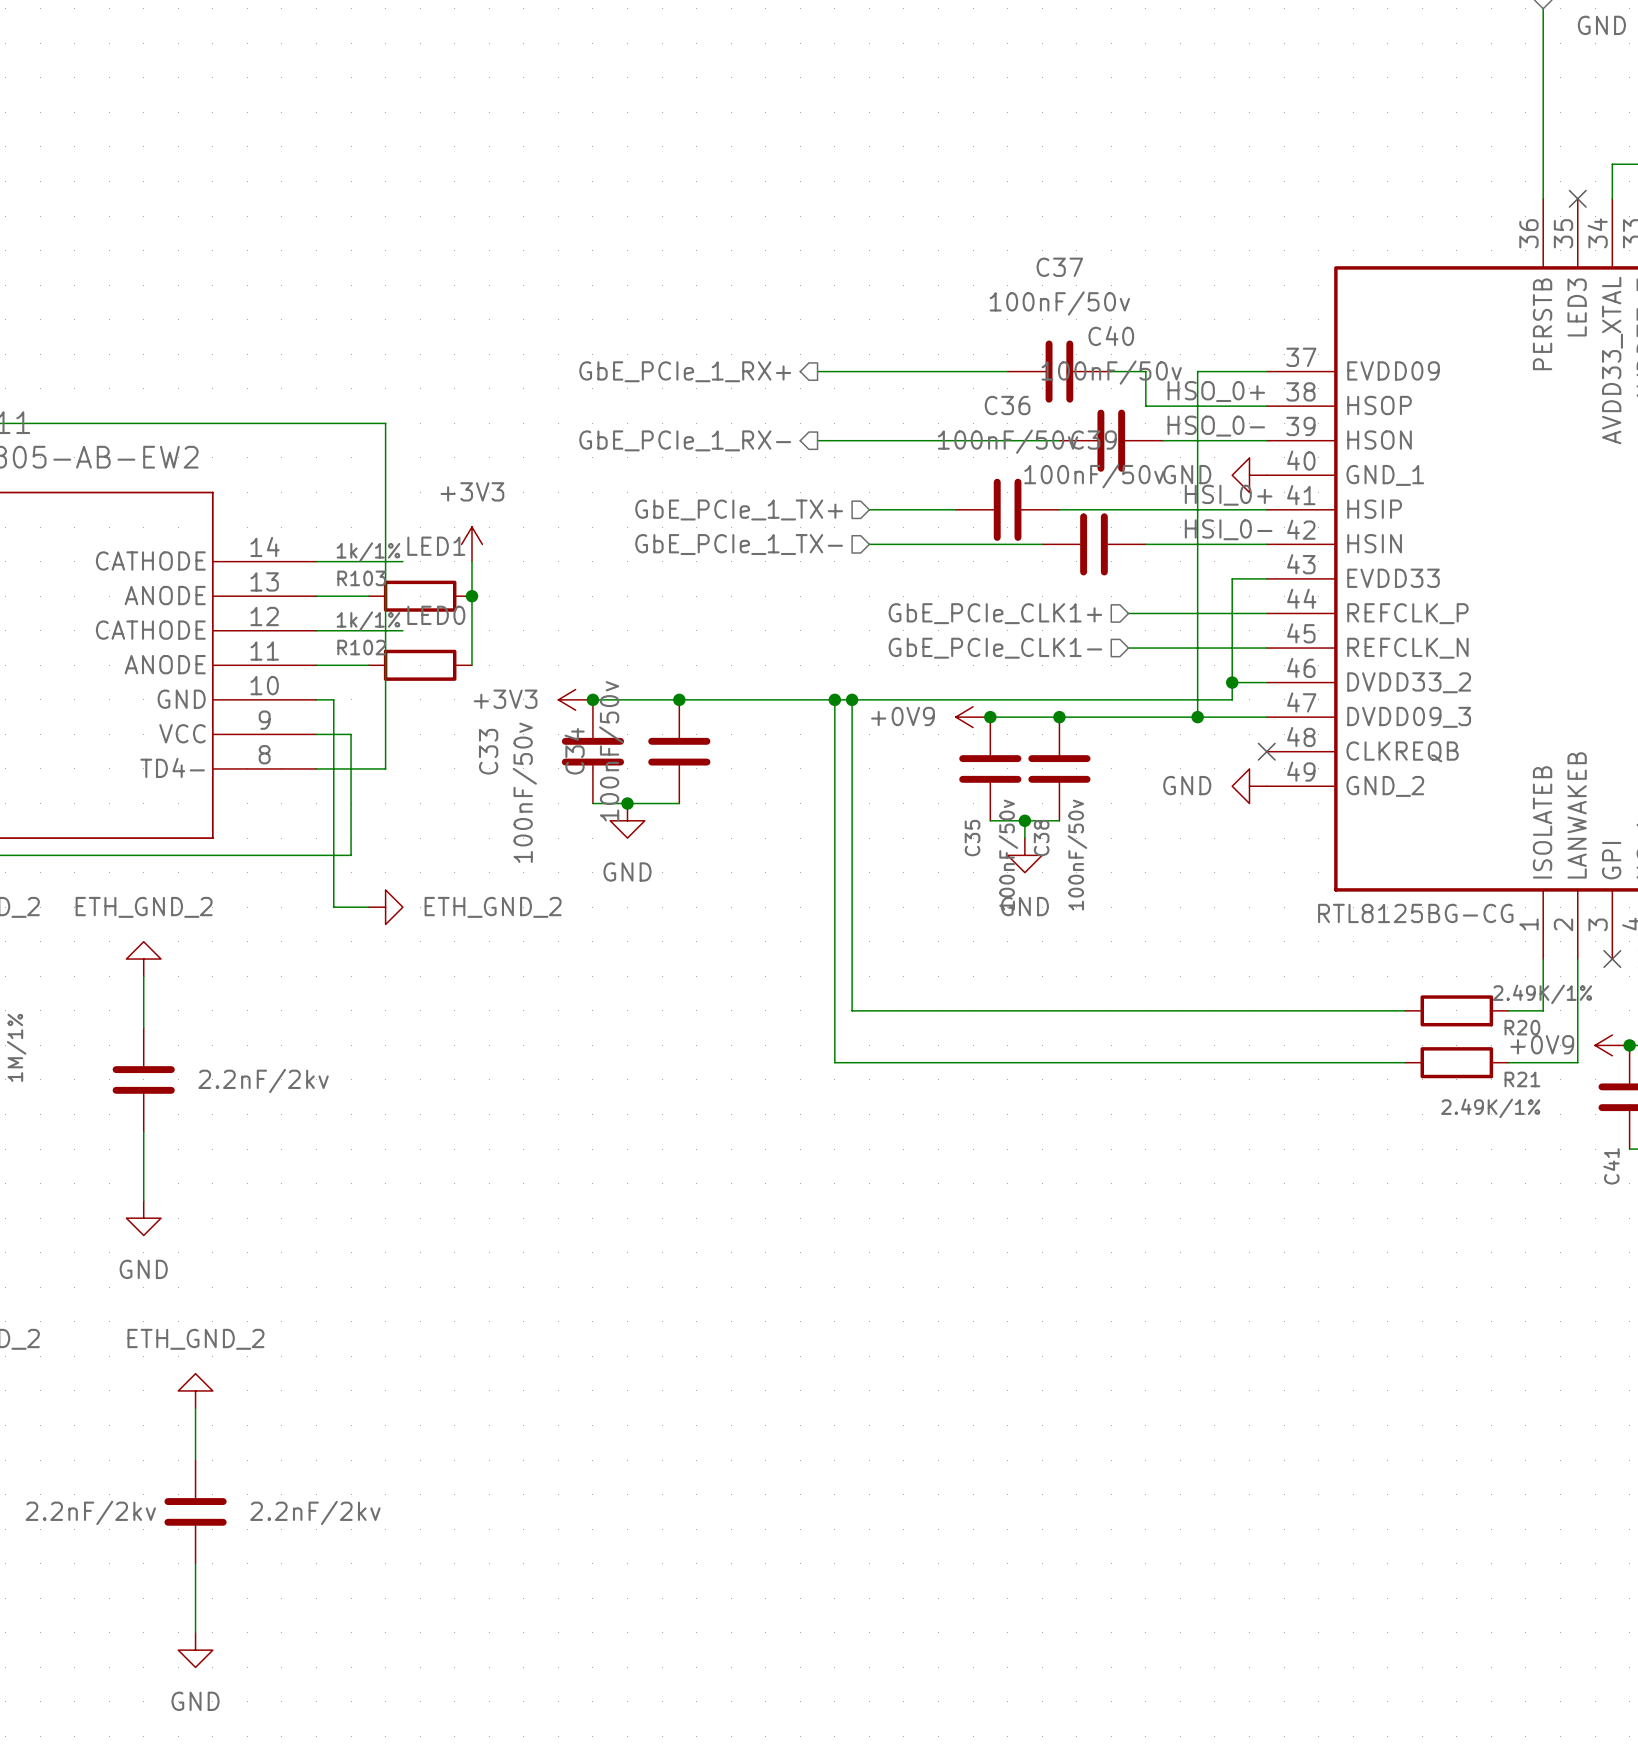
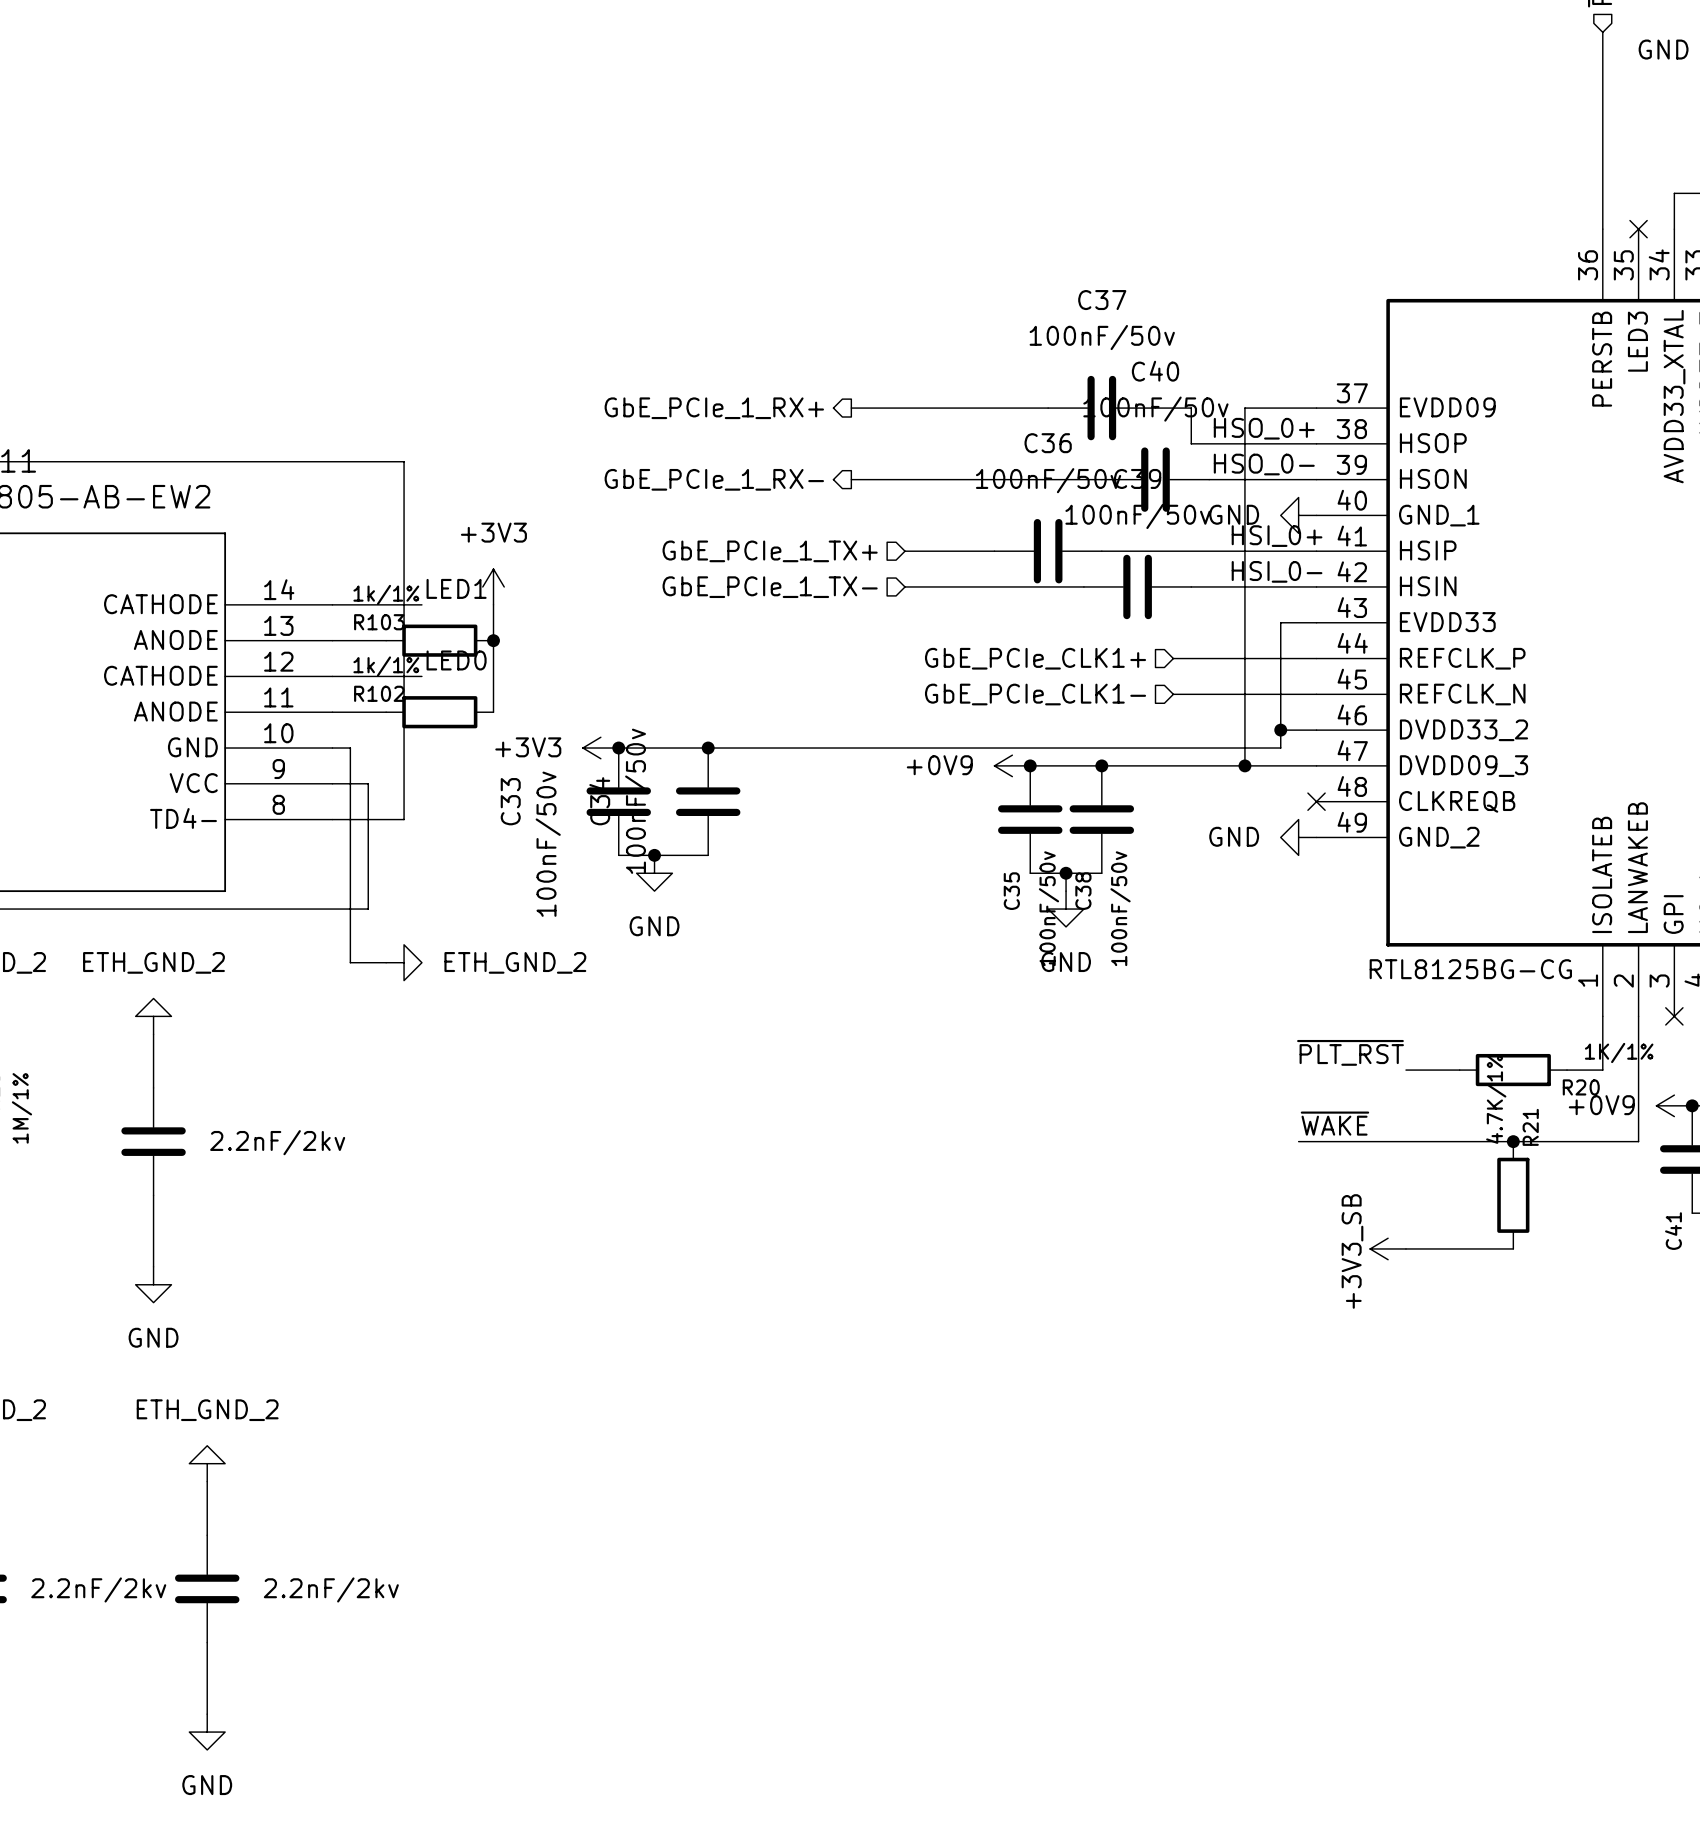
wire: (834, 699) (834, 1062) (1404, 1062) -> none
junction: (834, 699) -> none
wire: (852, 699) (852, 1010) (1353, 1010) -> none
junction: (852, 699) -> none
label: none -> ~{PLT_RST} (1350, 1052)
R20 value: 2.49K/1% (1542, 994) -> 1K/1% (1619, 1052)
label: none -> ~{WAKE} (1334, 1123)
R21 rotation: 0° (1456, 1062) -> 90° clockwise (1513, 1195)
R21 position: (1456, 1062) -> (1513, 1195)
wire: (1508, 1062) (1577, 1062) -> (1298, 1141) (1638, 1141) (1638, 1123)
junction: none -> (1513, 1141)
R21 name position: R21 (1522, 1079) -> R21 (1530, 1127)
R21 value: 2.49K/1% (1490, 1108) -> 4.7K/1% (1496, 1099)
power symbol: none -> +3V3_SB (1388, 1248)
wire: none -> (1405, 1248) (1513, 1248)

